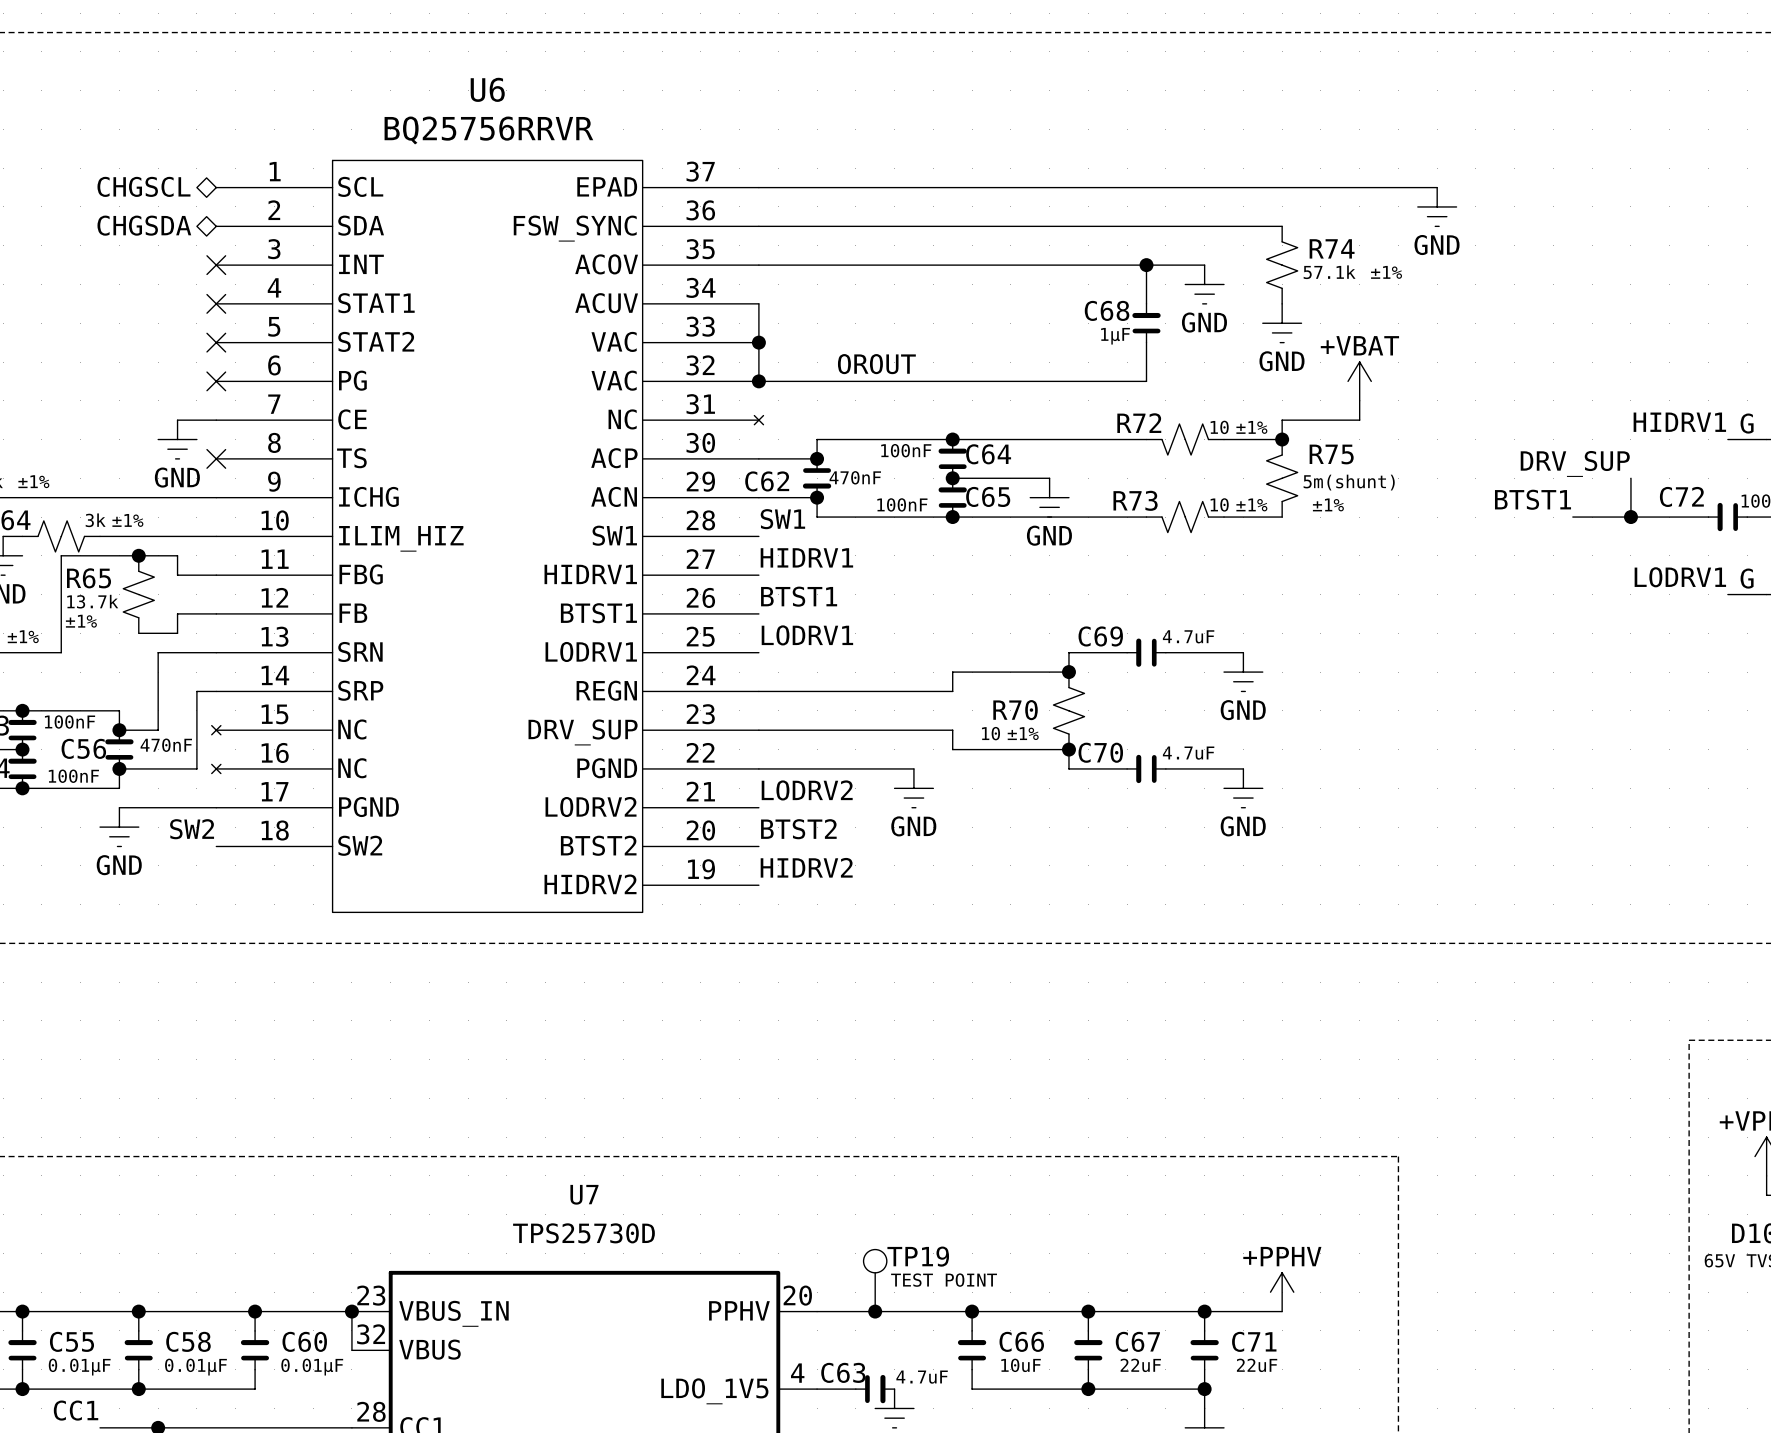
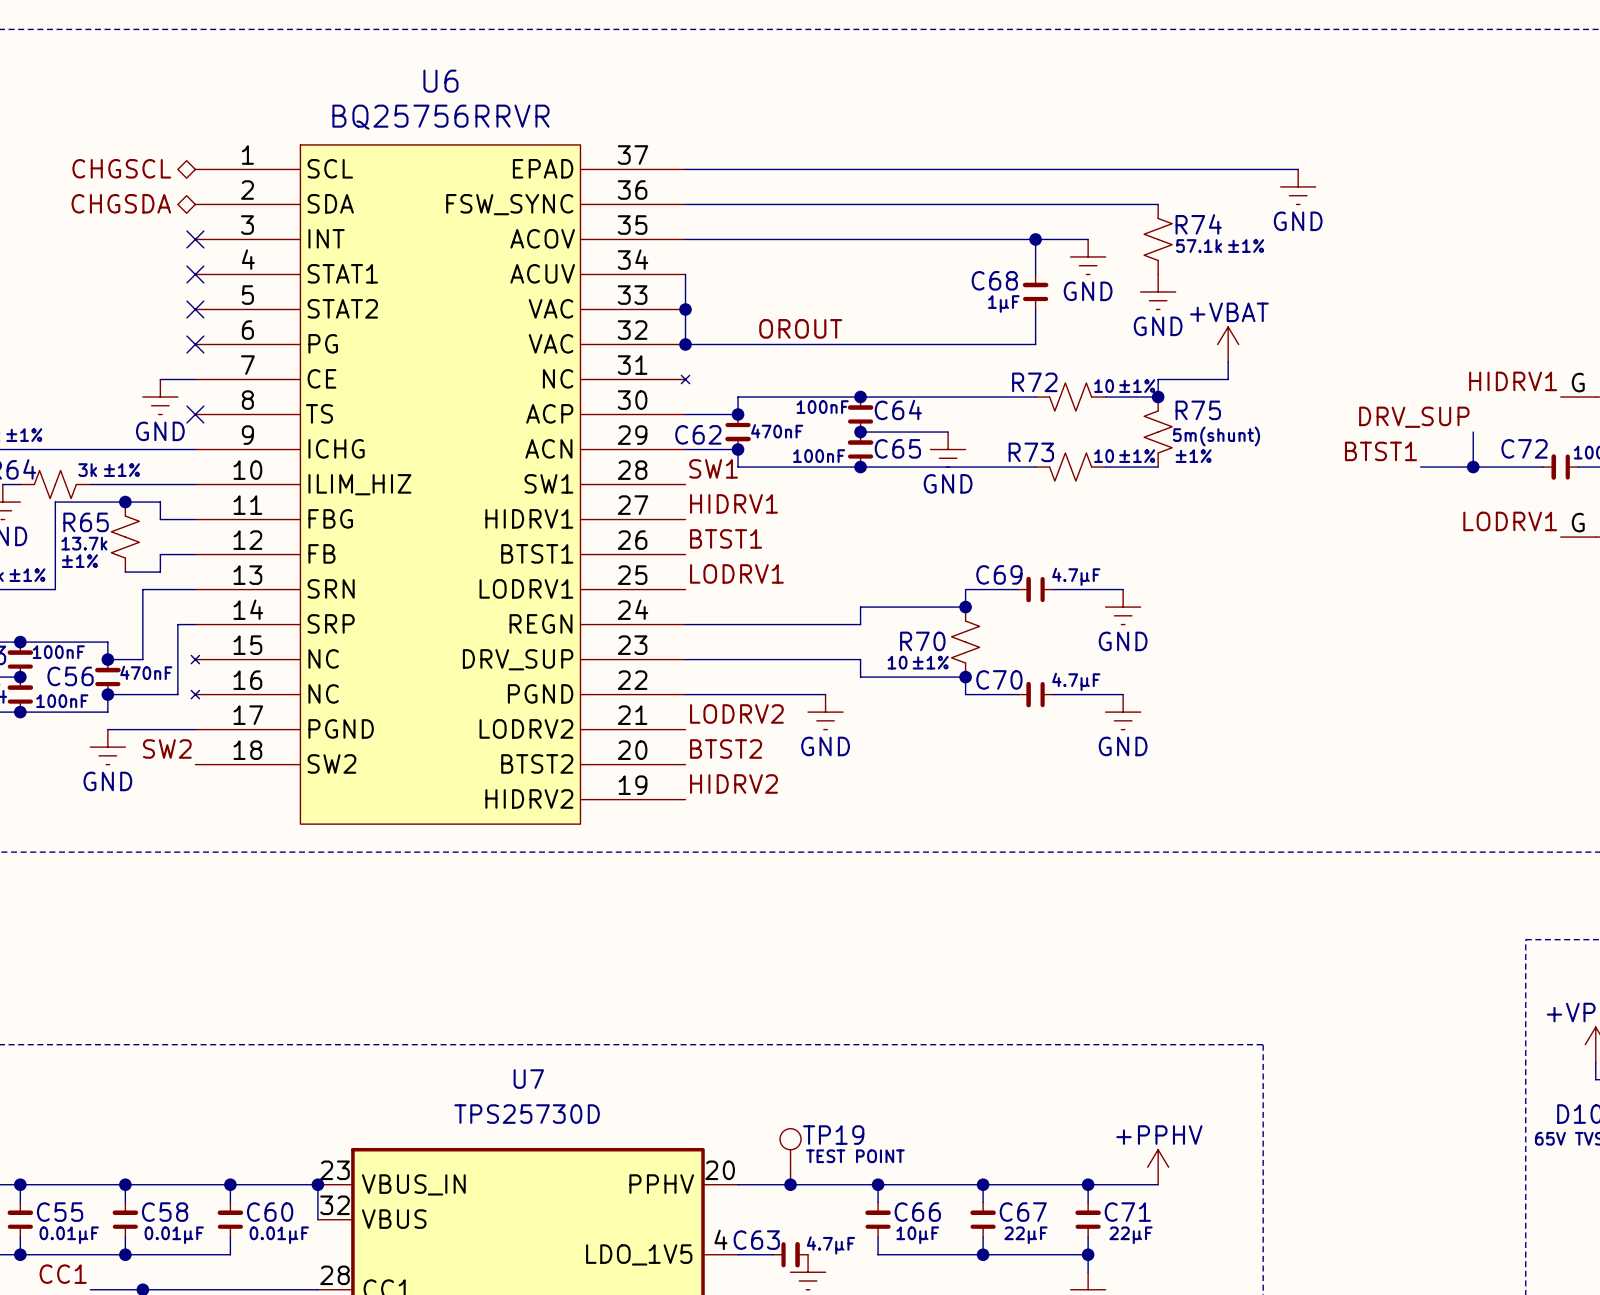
C69 value: 4.7uF (1188, 636) -> 4.7µF (1076, 576)
C70 value: 4.7uF (1188, 753) -> 4.7µF (1076, 681)
C66 value: 10uF (1021, 1365) -> 10µF (917, 1235)
C67 value: 22uF (1140, 1365) -> 22µF (1026, 1235)
C71 value: 22uF (1257, 1365) -> 22µF (1131, 1235)
C63 value: 4.7uF (922, 1377) -> 4.7µF (830, 1245)

